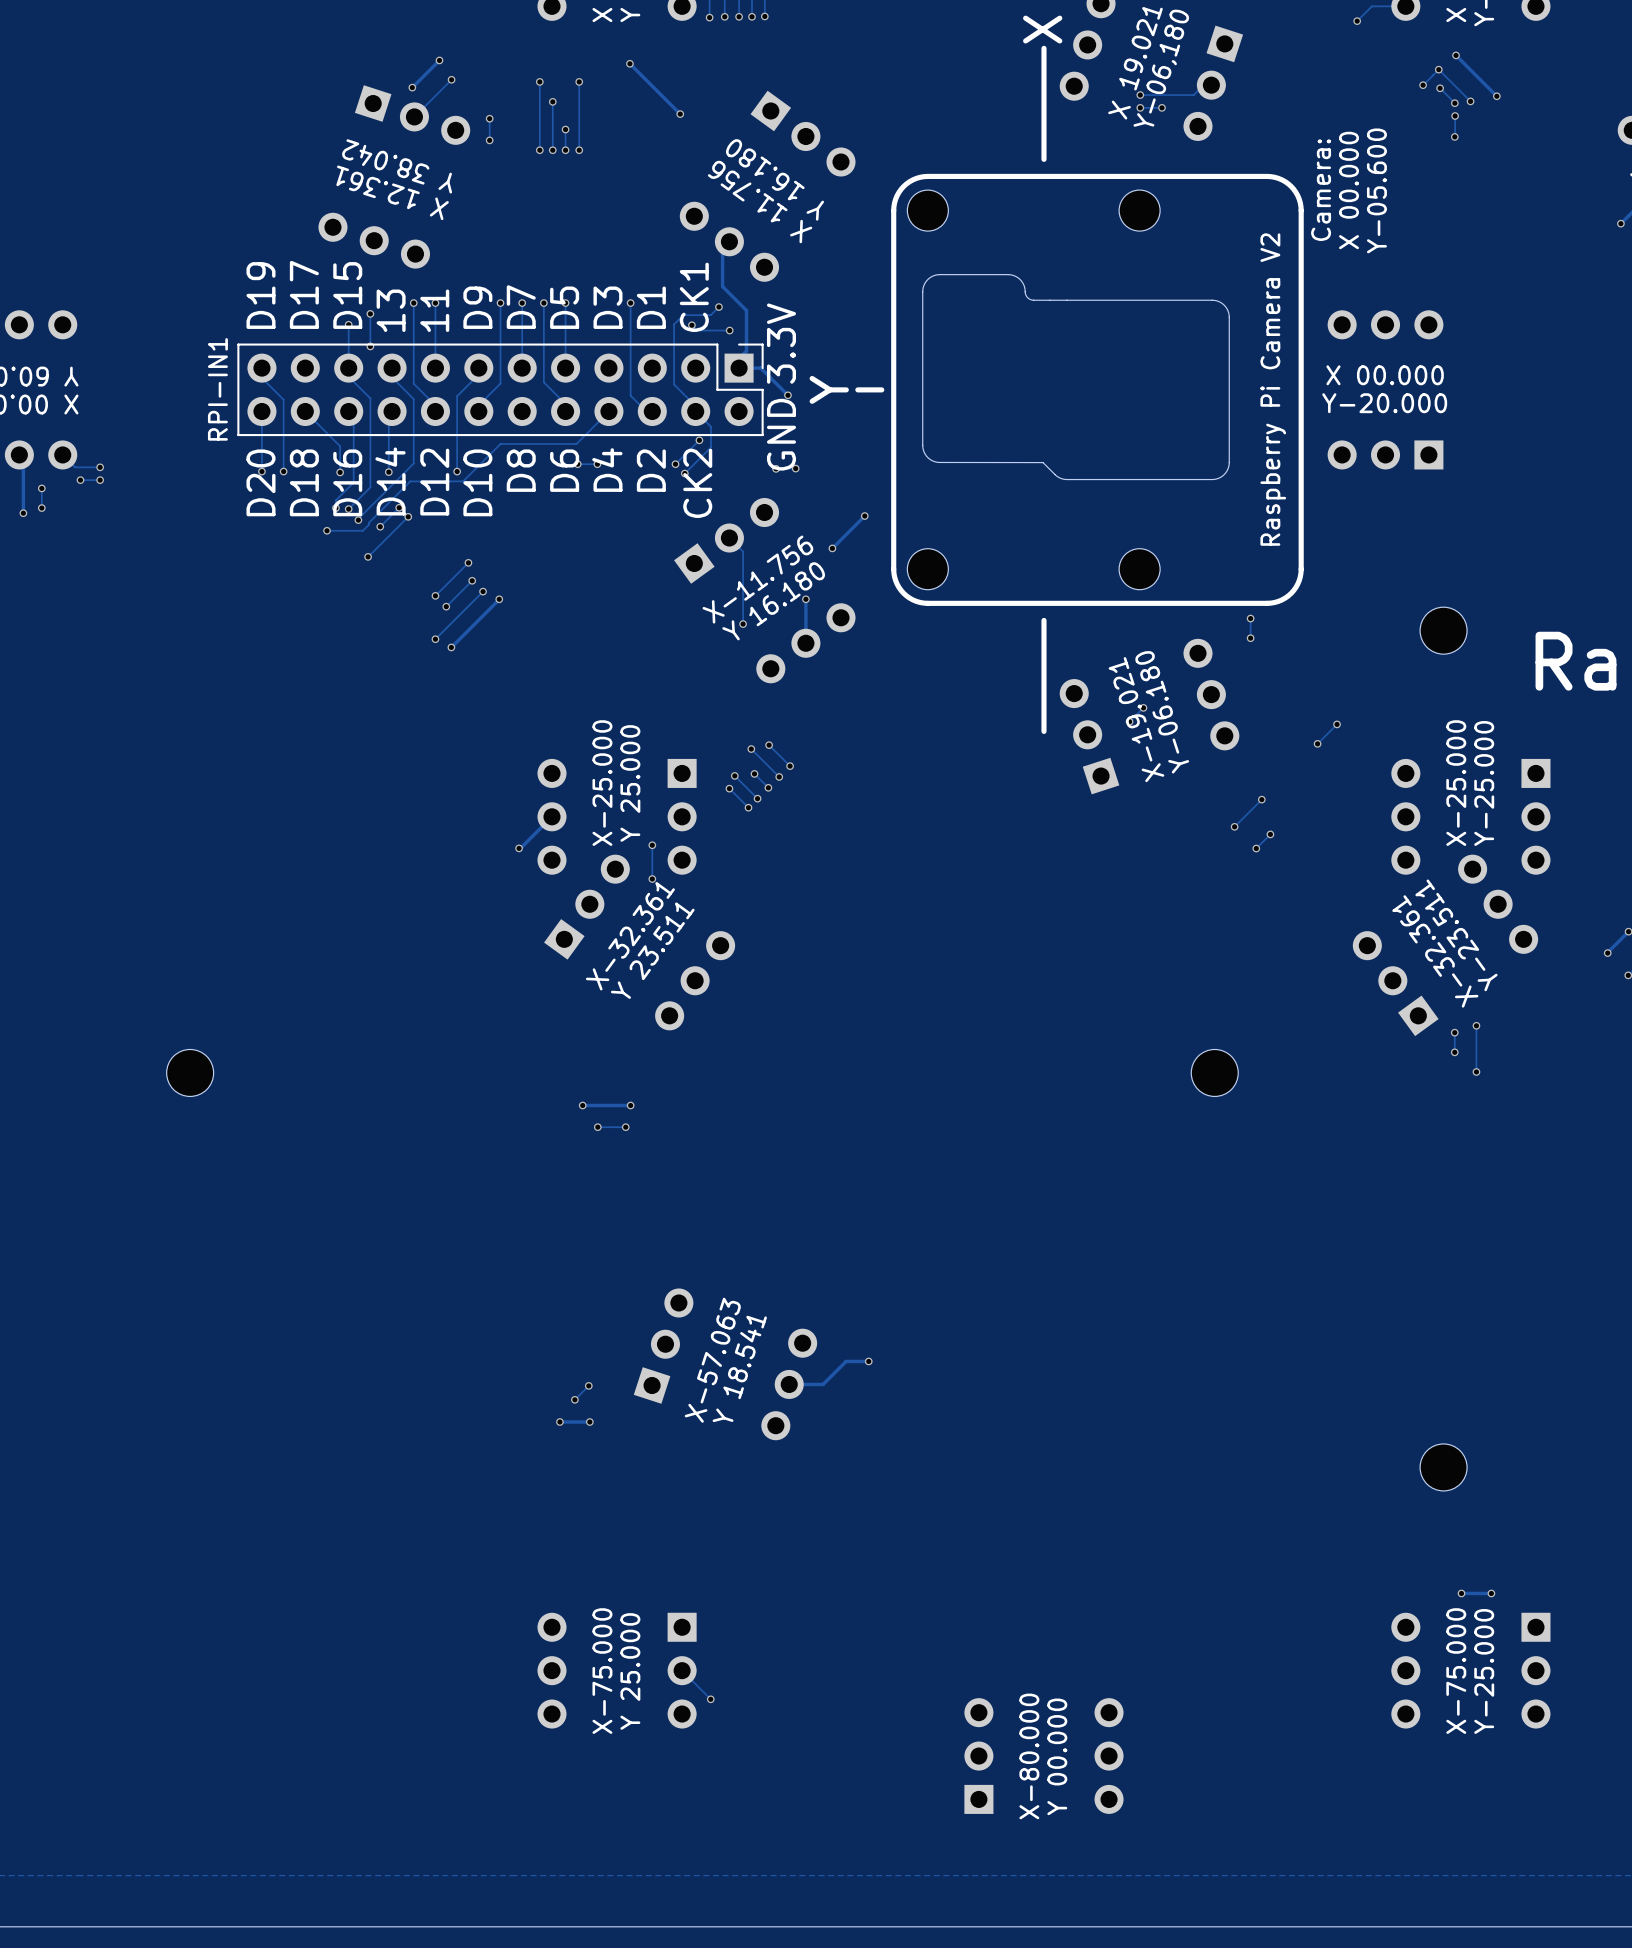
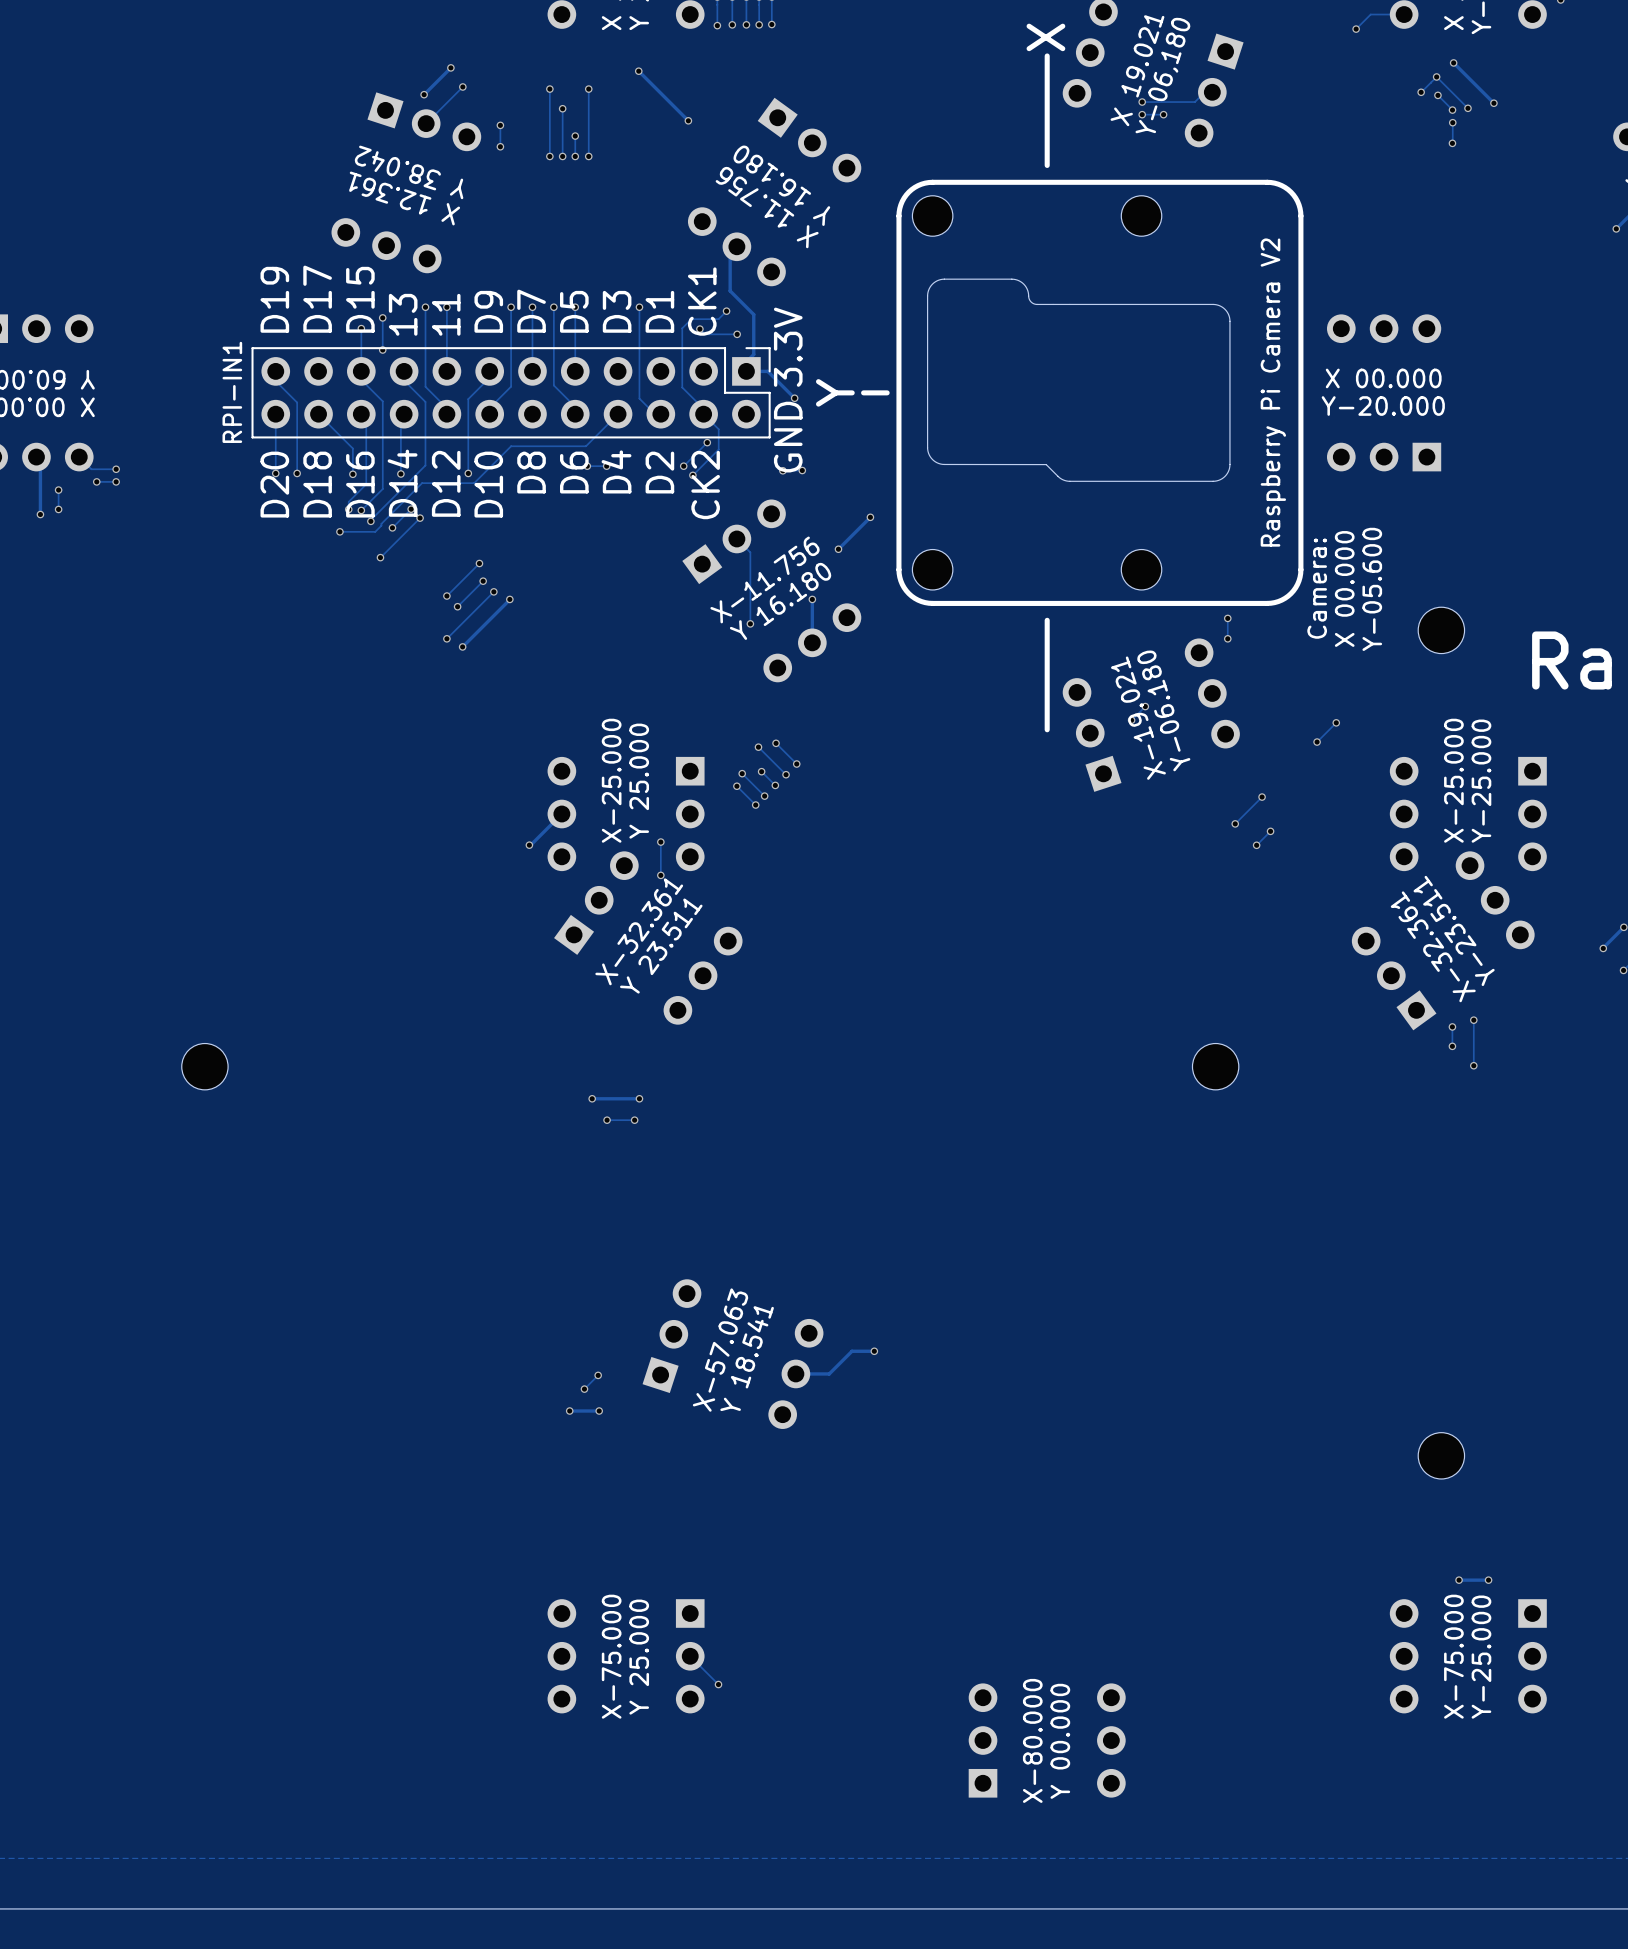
text position: Camera: (1321, 190) -> Camera: (1317, 588)
text position: X 00.000 (1349, 190) -> X 00.000 (1344, 588)
text position: Y-05.600 (1376, 190) -> Y-05.600 (1372, 589)
track: none -> (1227, 618) (1227, 638)
via: none -> (1227, 618)
track: (1250, 618) (1250, 638) -> none
via: (1250, 618) -> none
via: (1250, 638) -> none
via: none -> (1227, 638)

